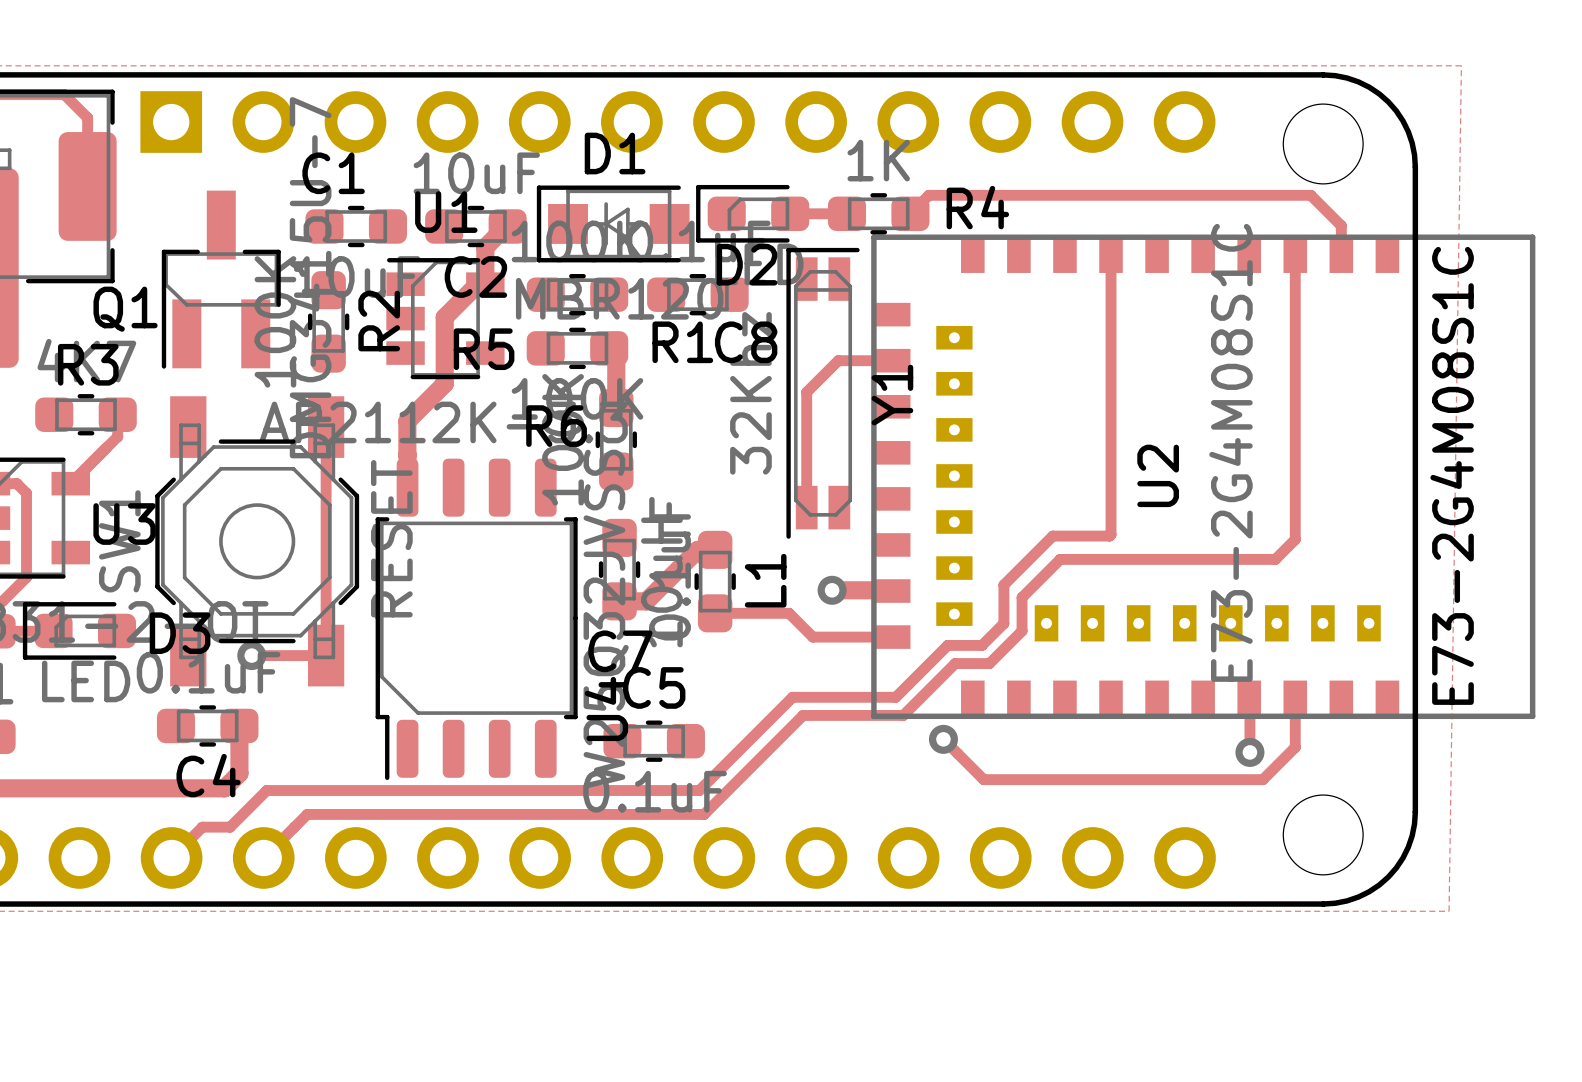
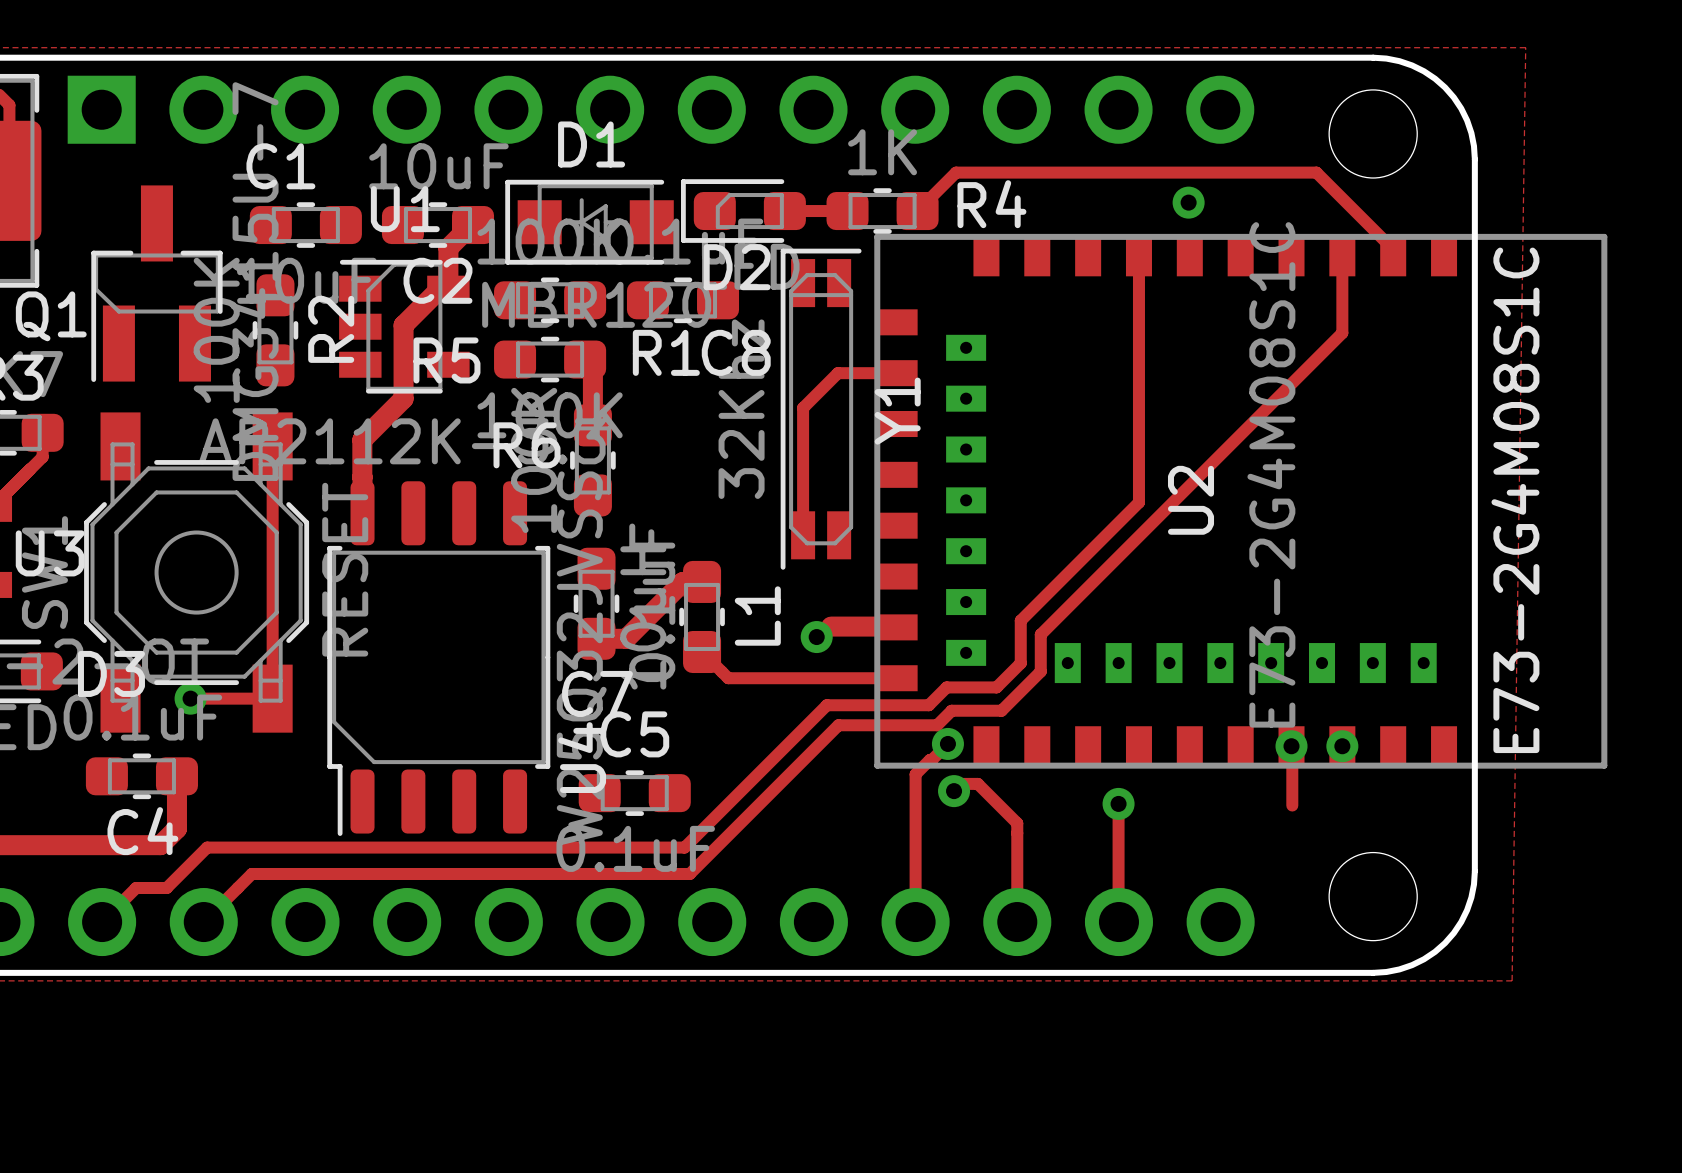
track: (928, 195) (1310, 195) (1341, 225) (1341, 248) -> (938, 190) (956, 172) (1316, 172) (1393, 249)
via: none -> (1188, 202)
track: (1295, 324) (1295, 539) (1275, 559) (1060, 559) -> (1342, 333) (1082, 592)
track: (1111, 477) (1109, 536) (1052, 536) -> (1138, 502) (1074, 566)
via position: (832, 590) -> (816, 637)
track: (715, 613) (789, 613) (812, 637) -> (702, 652) (728, 678) (809, 678)
track: (947, 645) (895, 697) (792, 697) -> (958, 687) (946, 687) (928, 705) (826, 705) (787, 744)
track: (989, 663) (955, 663) (903, 715) (803, 715) -> (1004, 707) (1001, 710) (951, 710) (937, 725) (838, 725) (799, 764)
track: none -> (947, 743) (915, 774) (915, 922)
via: none -> (947, 743)
via: none -> (1291, 746)
track: (1295, 698) (1295, 747) (1263, 779) (983, 779) (943, 739) -> none
via: none -> (1342, 746)
track: none -> (955, 783) (977, 783) (1017, 823) (1017, 922)
track: none -> (1118, 803) (1118, 921)
via: none -> (1118, 803)
via: (1249, 752) -> none

